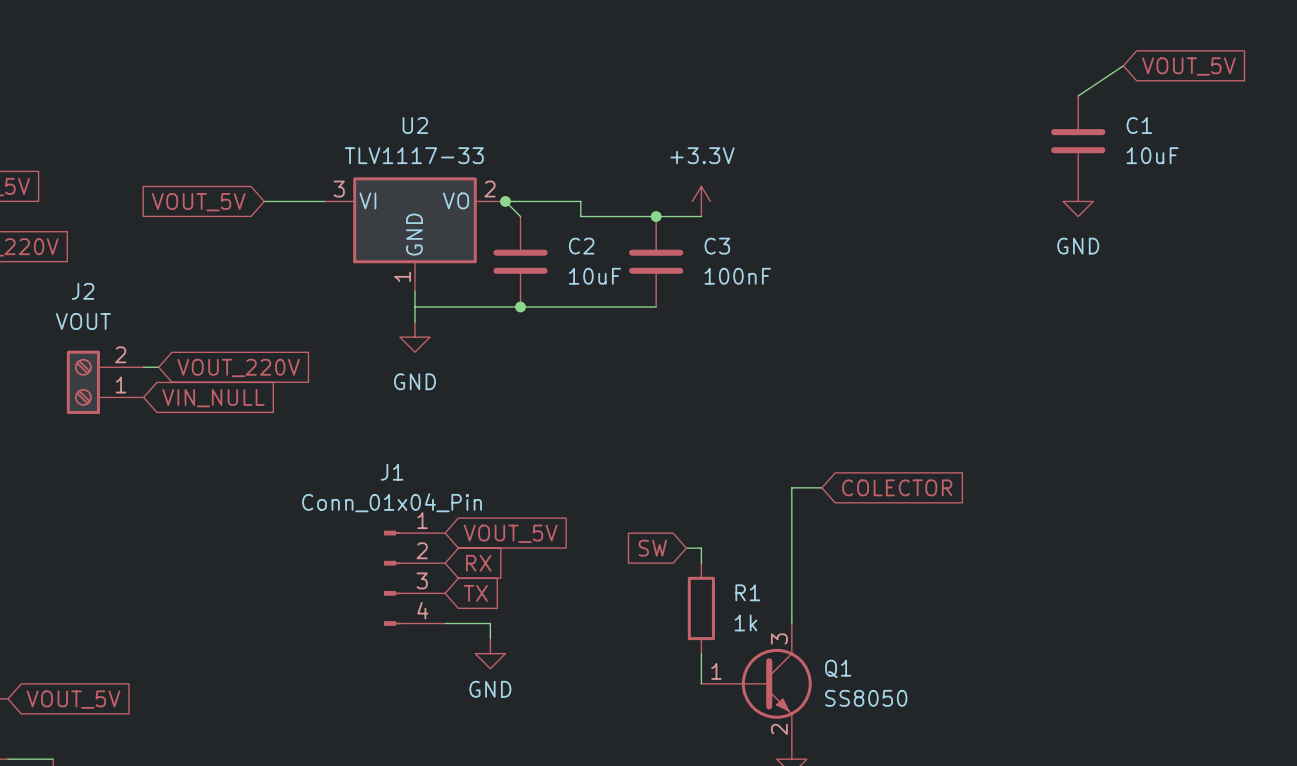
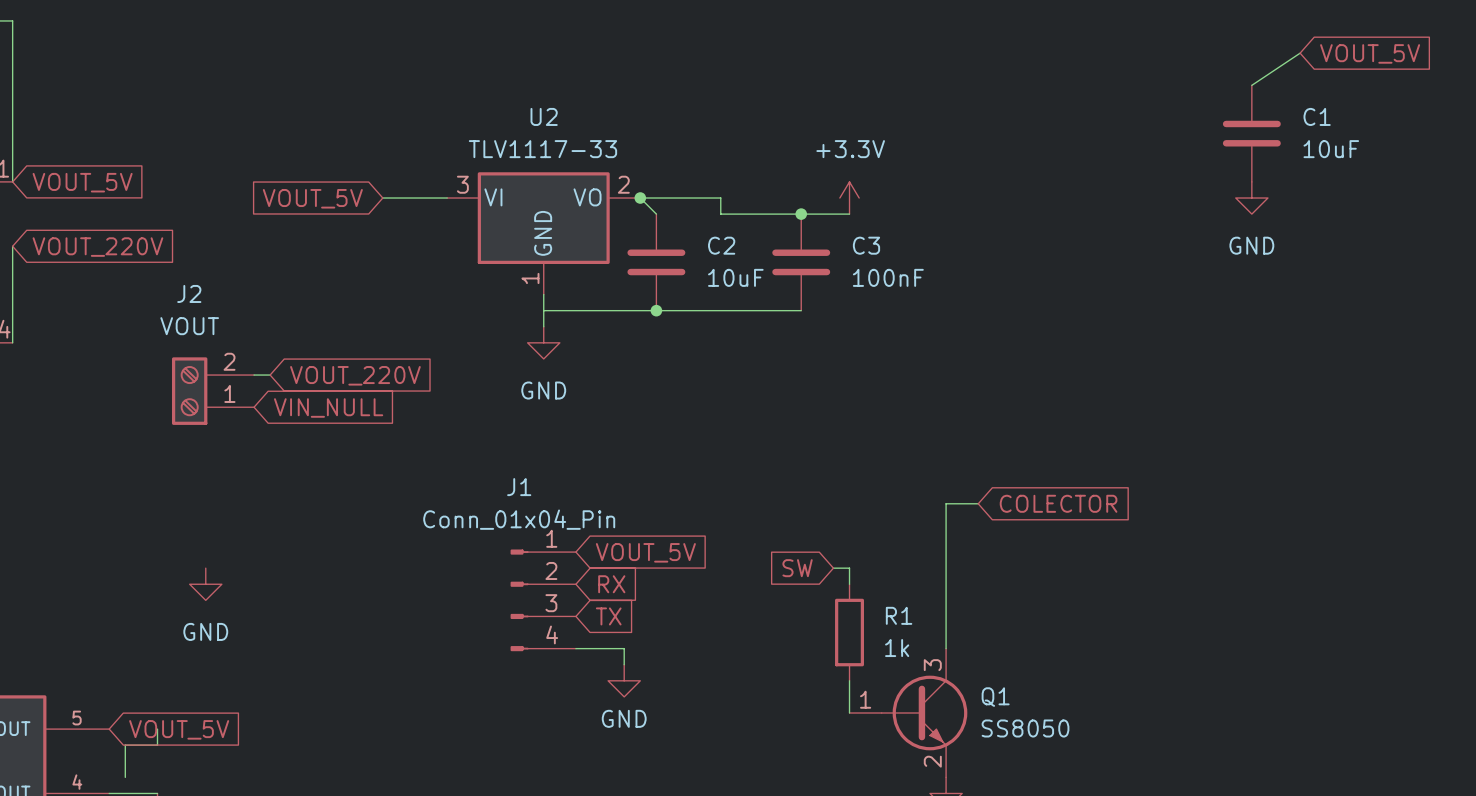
power symbol: none -> GND (205, 584)
wire: none -> (157, 729) (157, 745) (125, 745) (125, 777)

